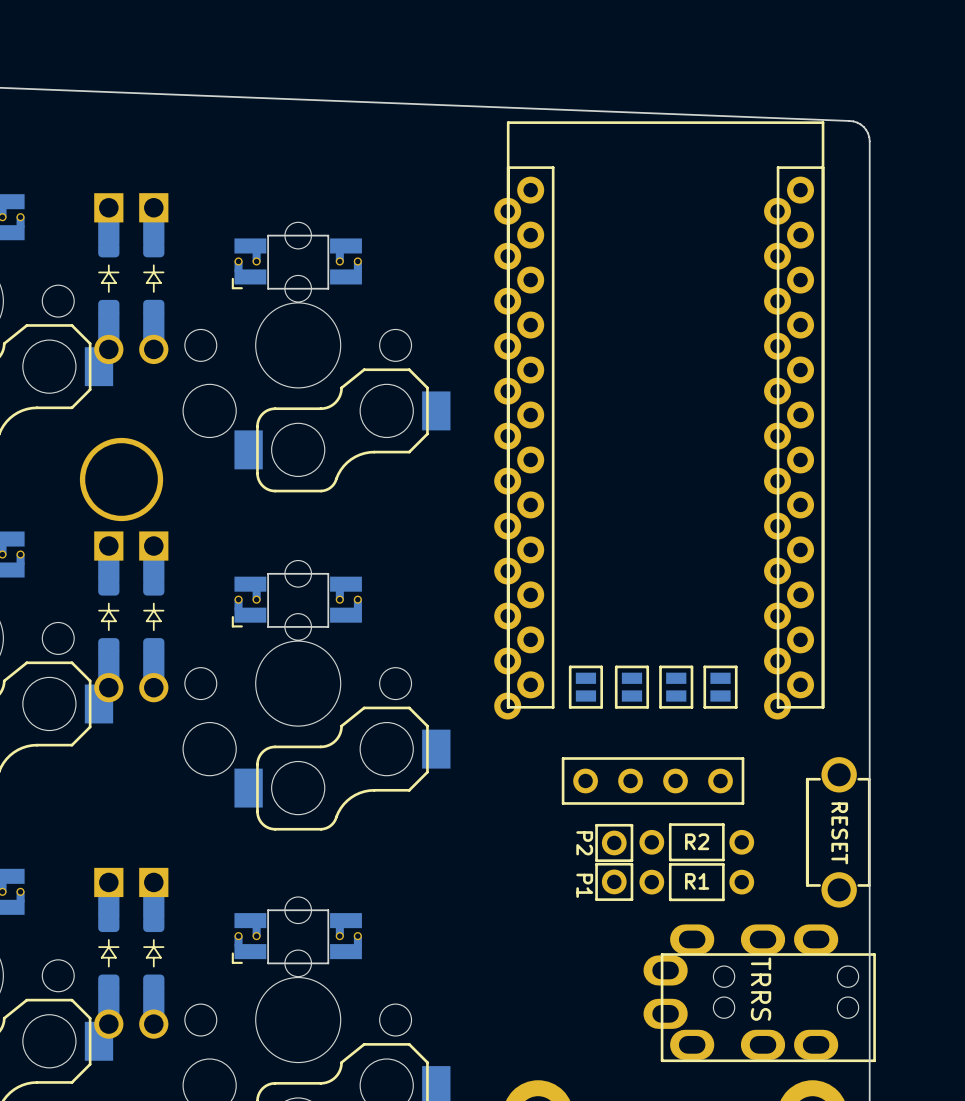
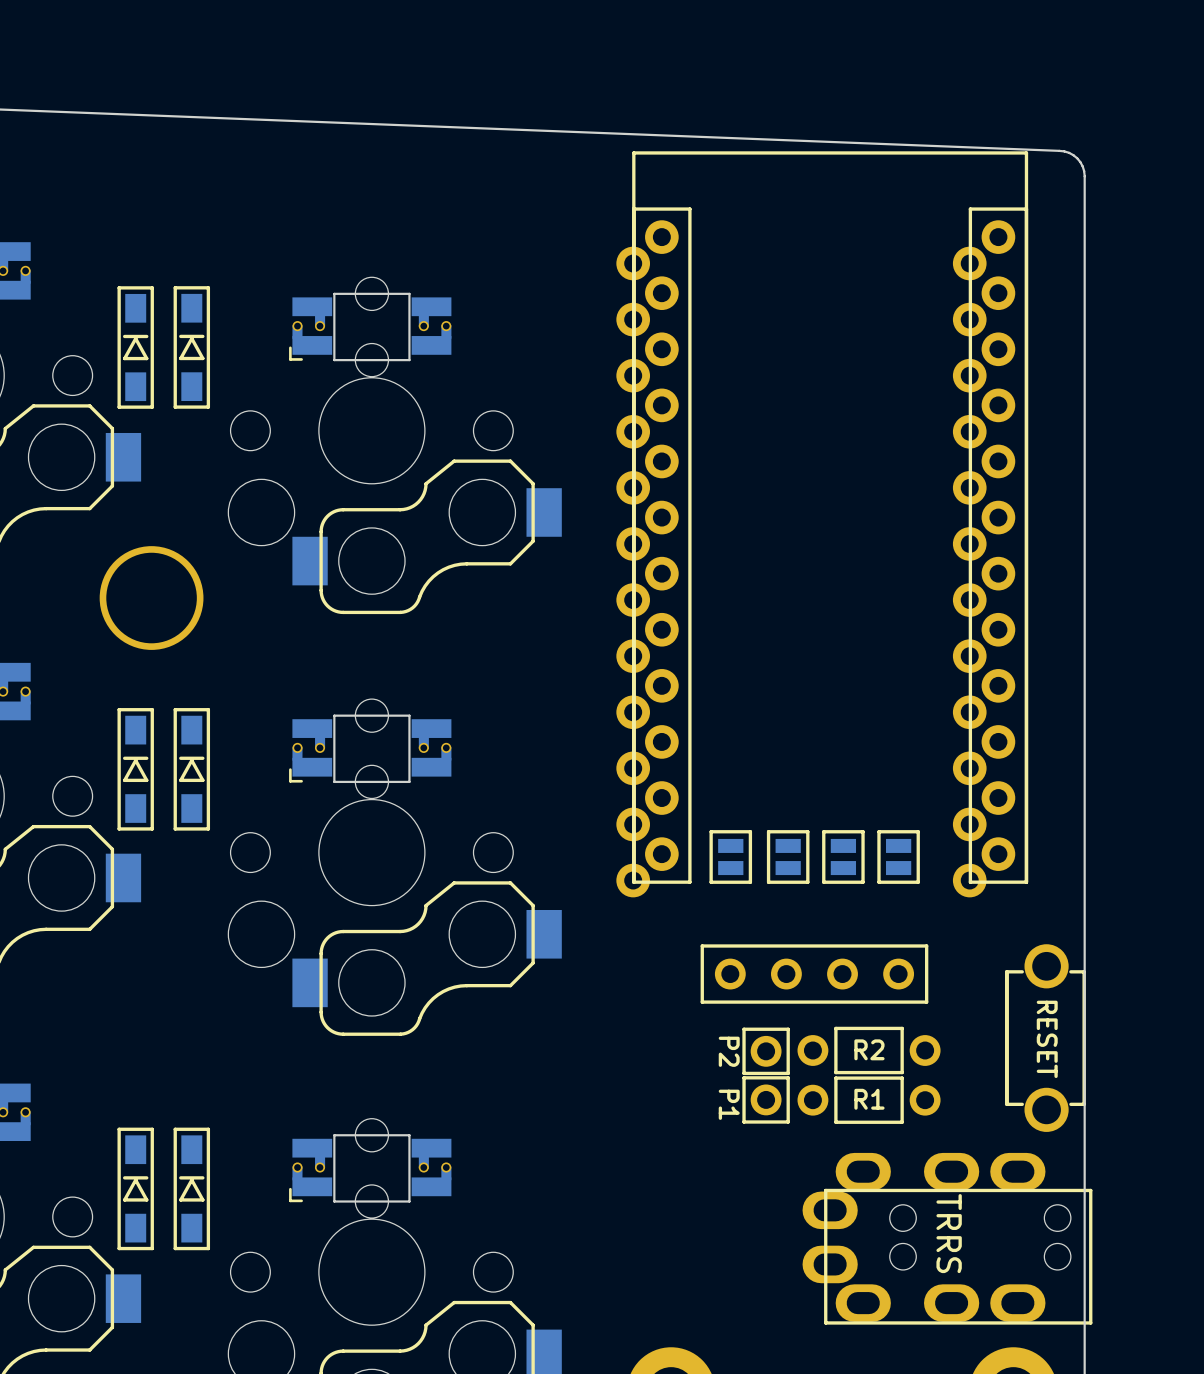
part footprint: [94, 193, 124, 365] -> [117, 286, 154, 409]
part footprint: [139, 193, 169, 365] -> [173, 286, 211, 409]
part footprint: [94, 531, 124, 703] -> [117, 708, 154, 831]
part footprint: [139, 531, 169, 703] -> [173, 708, 211, 831]
part footprint: [94, 867, 124, 1039] -> [117, 1127, 154, 1251]
part footprint: [139, 867, 169, 1039] -> [173, 1127, 211, 1251]

